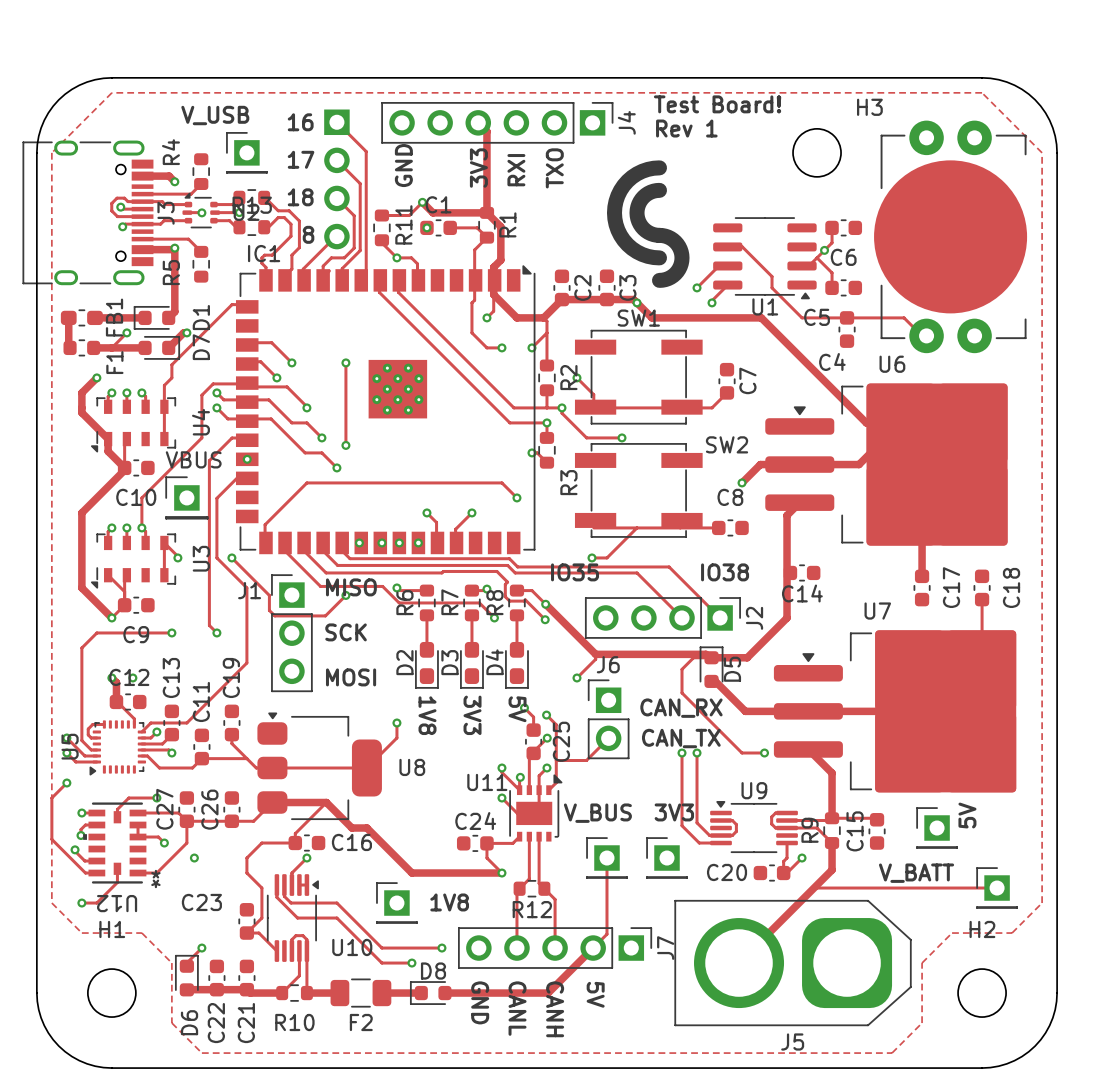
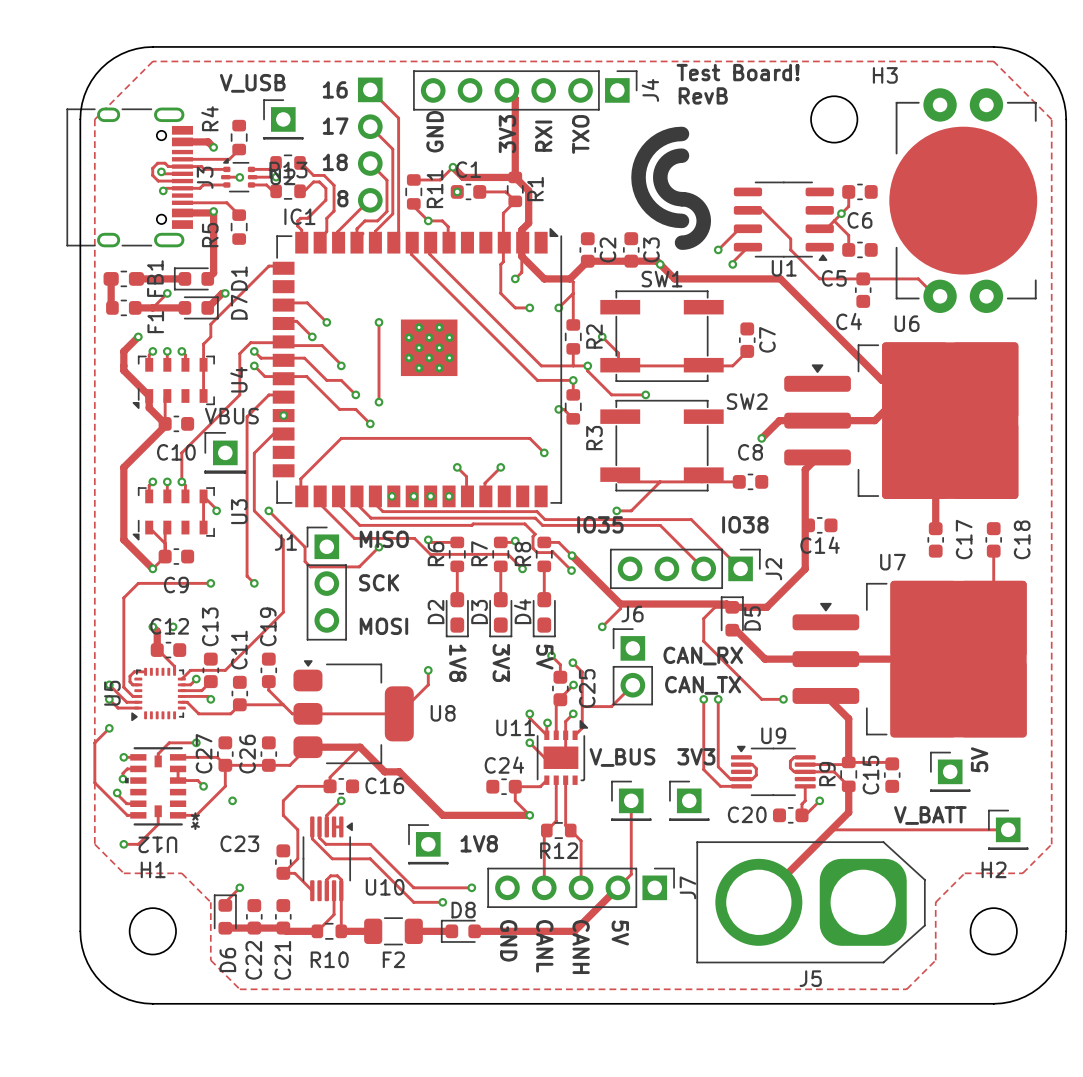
text: Rev 1 (686, 128) -> RevB (703, 95)

